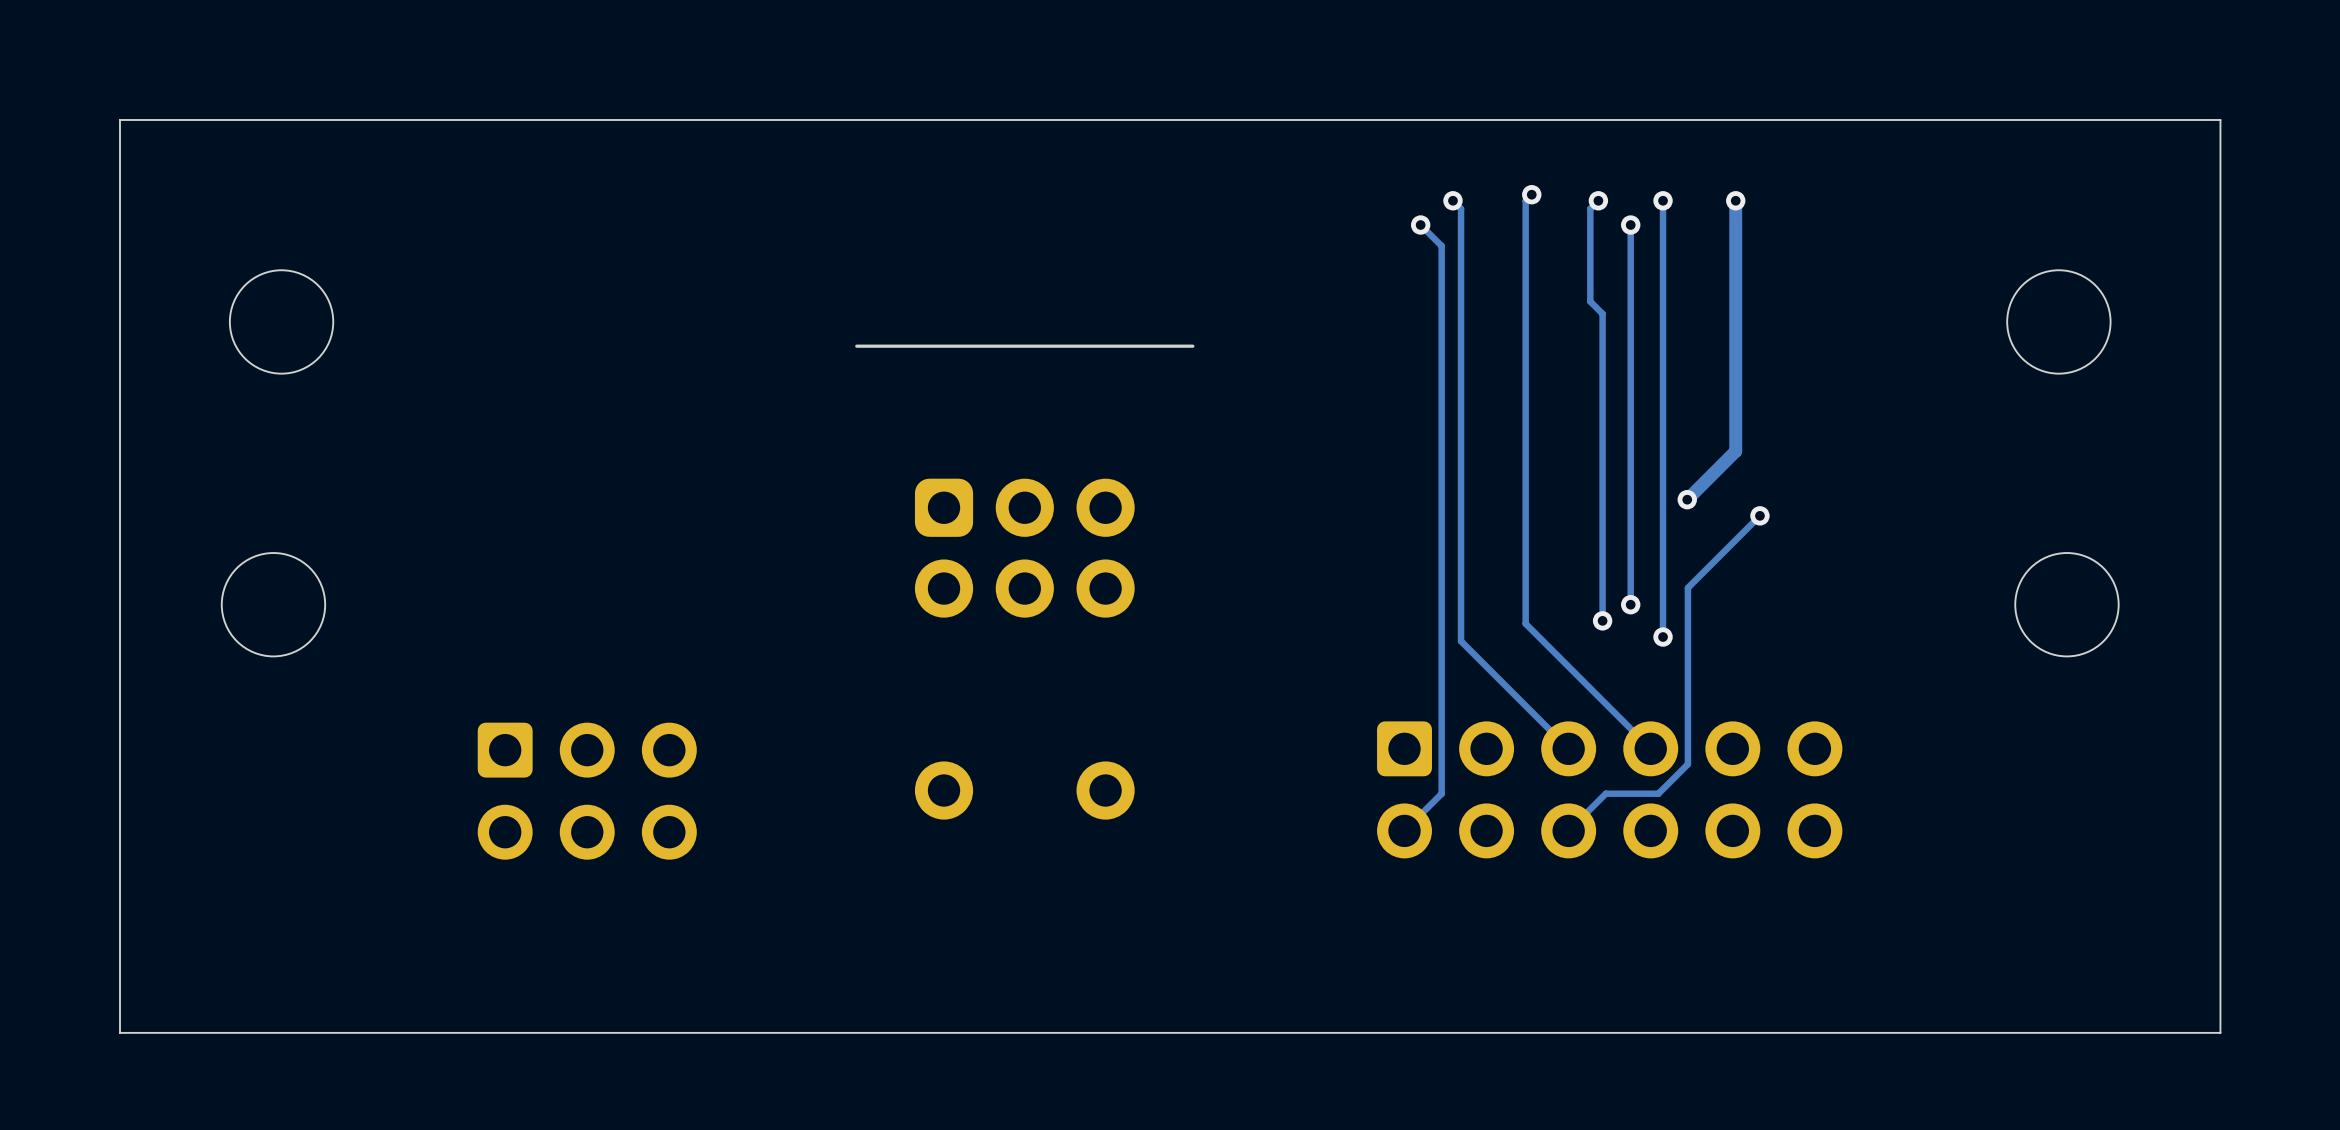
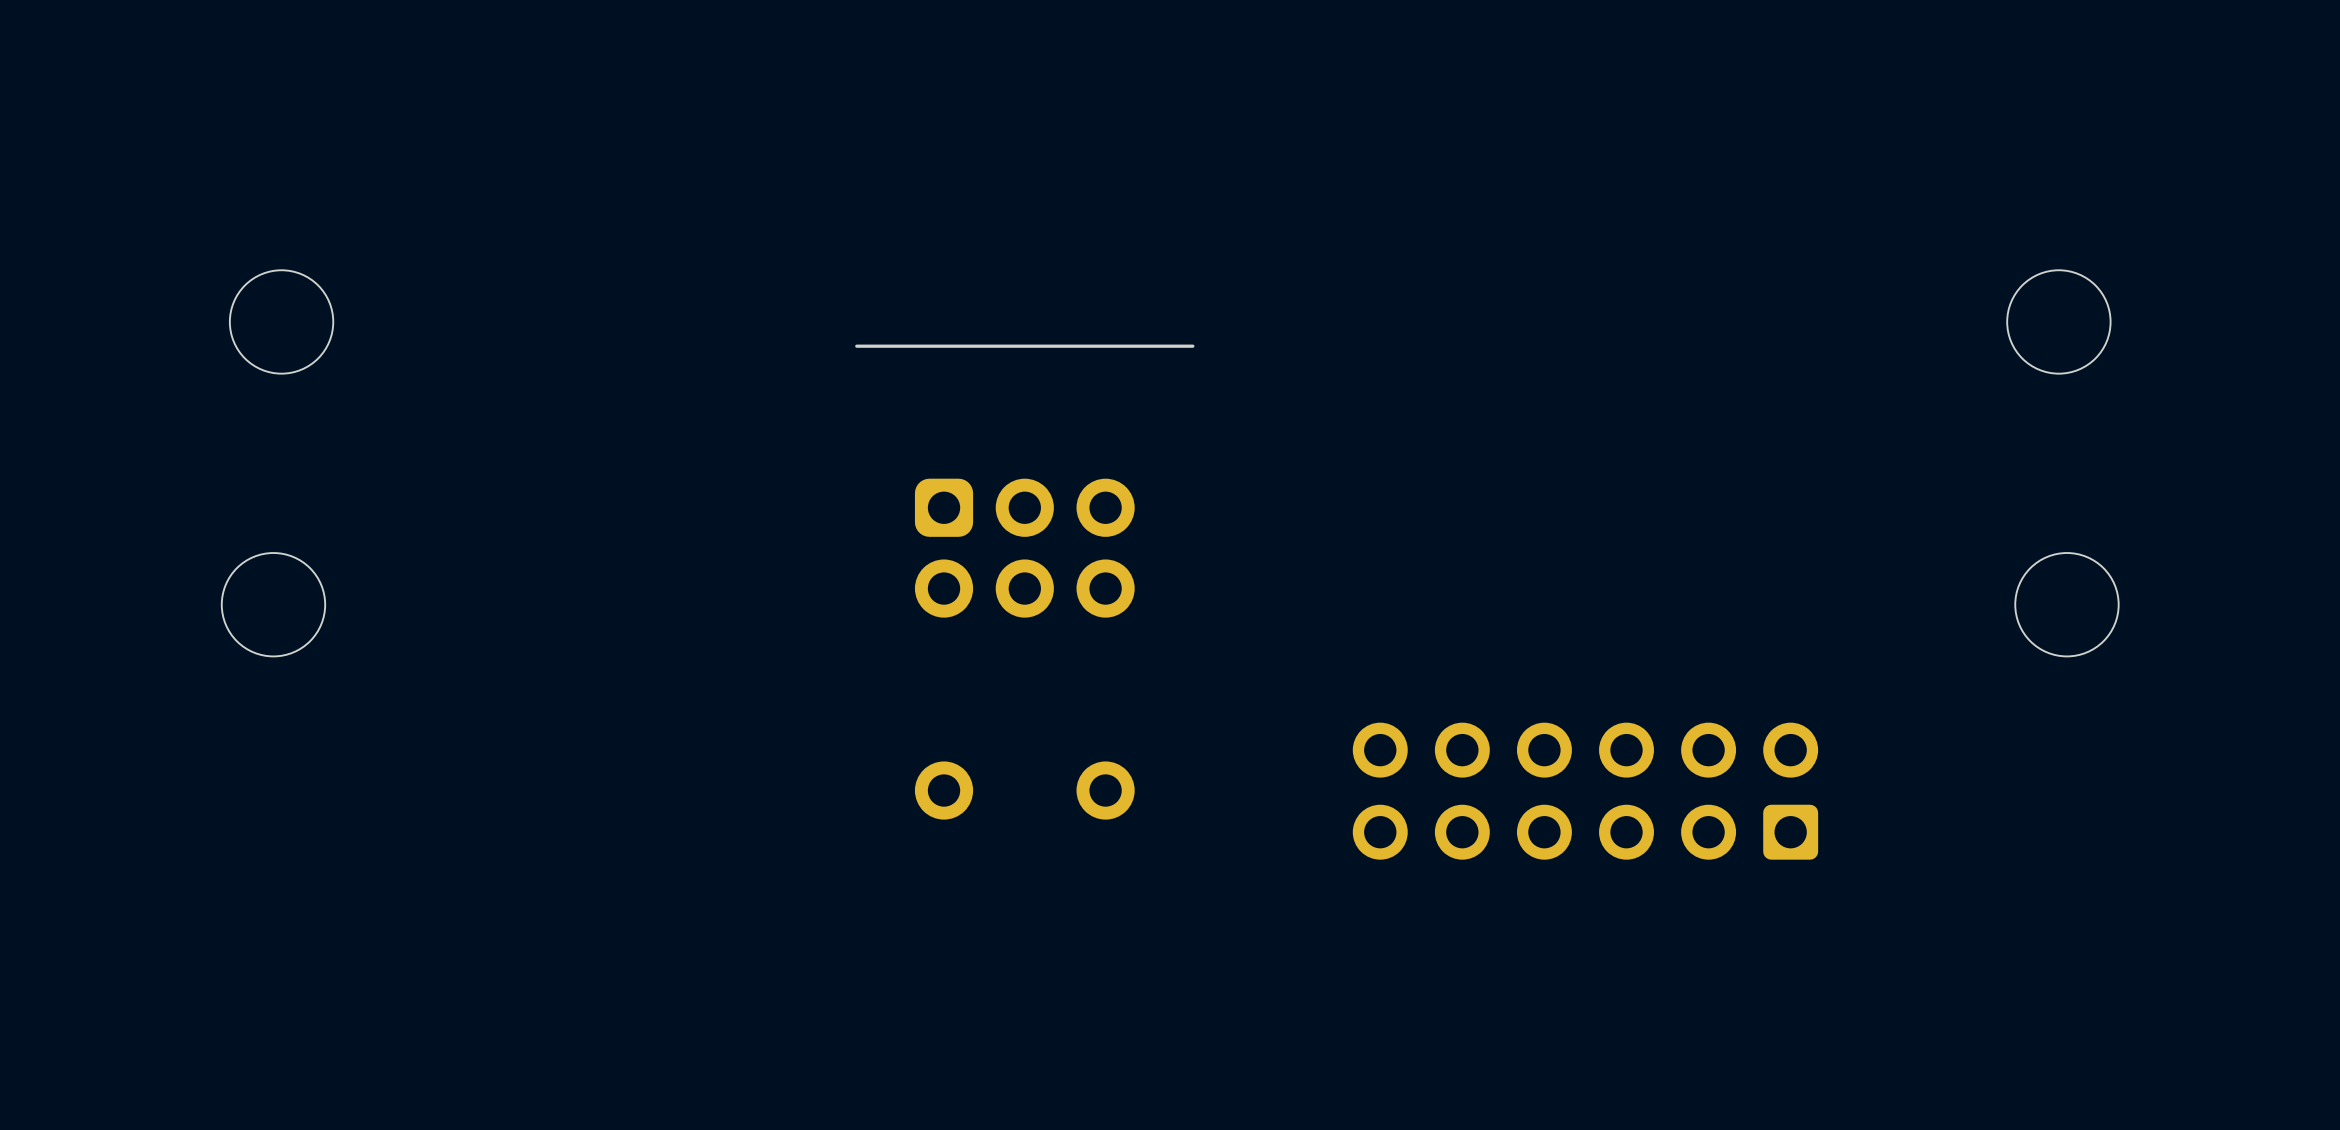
board edge: (2220, 119) (119, 119) (119, 1032) (2220, 1032) (2220, 119) -> none
track: (1531, 194) (1525, 200) (1525, 623) (1650, 748) -> none
via: (1531, 194) -> none
track: (1452, 200) (1461, 208) (1461, 641) (1568, 748) -> none
via: (1452, 200) -> none
track: (1598, 200) (1590, 208) (1590, 301) (1602, 313) (1602, 620) -> none
via: (1598, 200) -> none
track: (1663, 200) (1663, 637) -> none
via: (1663, 200) -> none
track: (1735, 200) (1735, 451) (1687, 499) -> none
via: (1735, 200) -> none
track: (1420, 225) (1441, 246) (1441, 793) (1404, 830) -> none
via: (1420, 225) -> none
track: (1630, 225) (1630, 604) -> none
via: (1630, 225) -> none
via: (1687, 499) -> none
track: (1759, 515) (1687, 587) (1687, 764) (1658, 793) (1605, 793) (1568, 830) -> none
via: (1759, 515) -> none
via: (1630, 604) -> none
via: (1602, 620) -> none
via: (1663, 637) -> none
part rotation: 0° (1609, 789) -> 180° (1585, 791)
part: (587, 791) -> none

